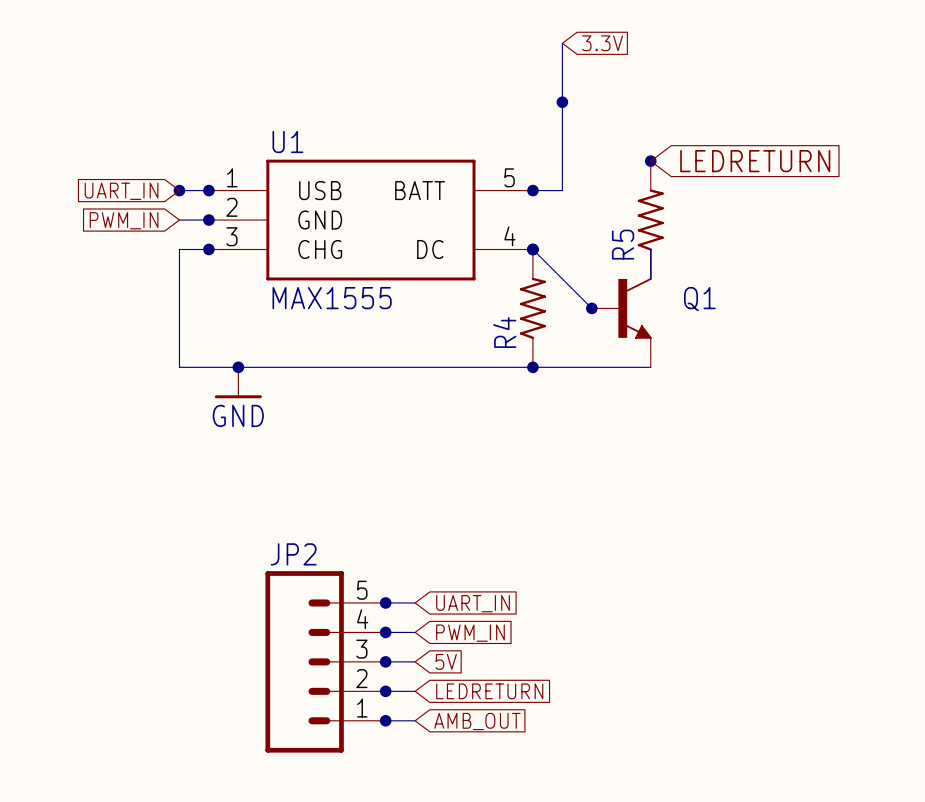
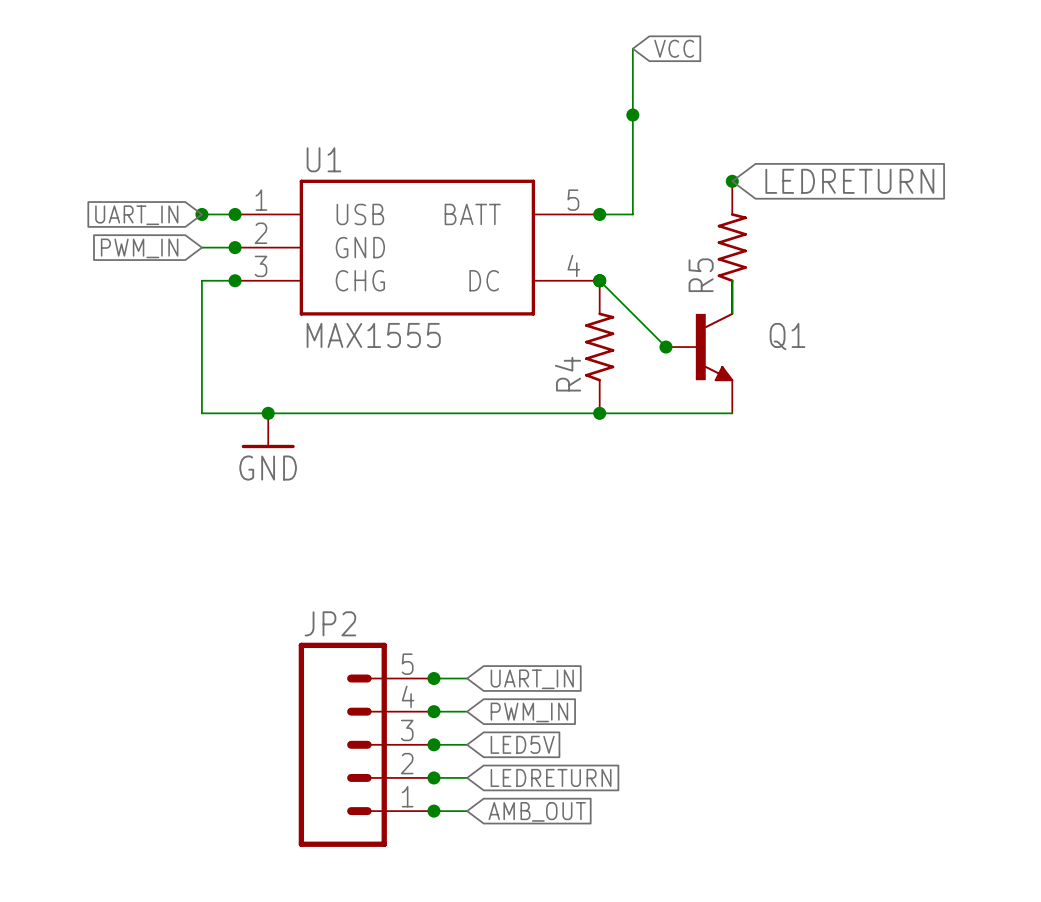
global label: 3.3V (602, 43) -> VCC (674, 48)
global label: 5V (446, 661) -> LED5V (522, 744)

